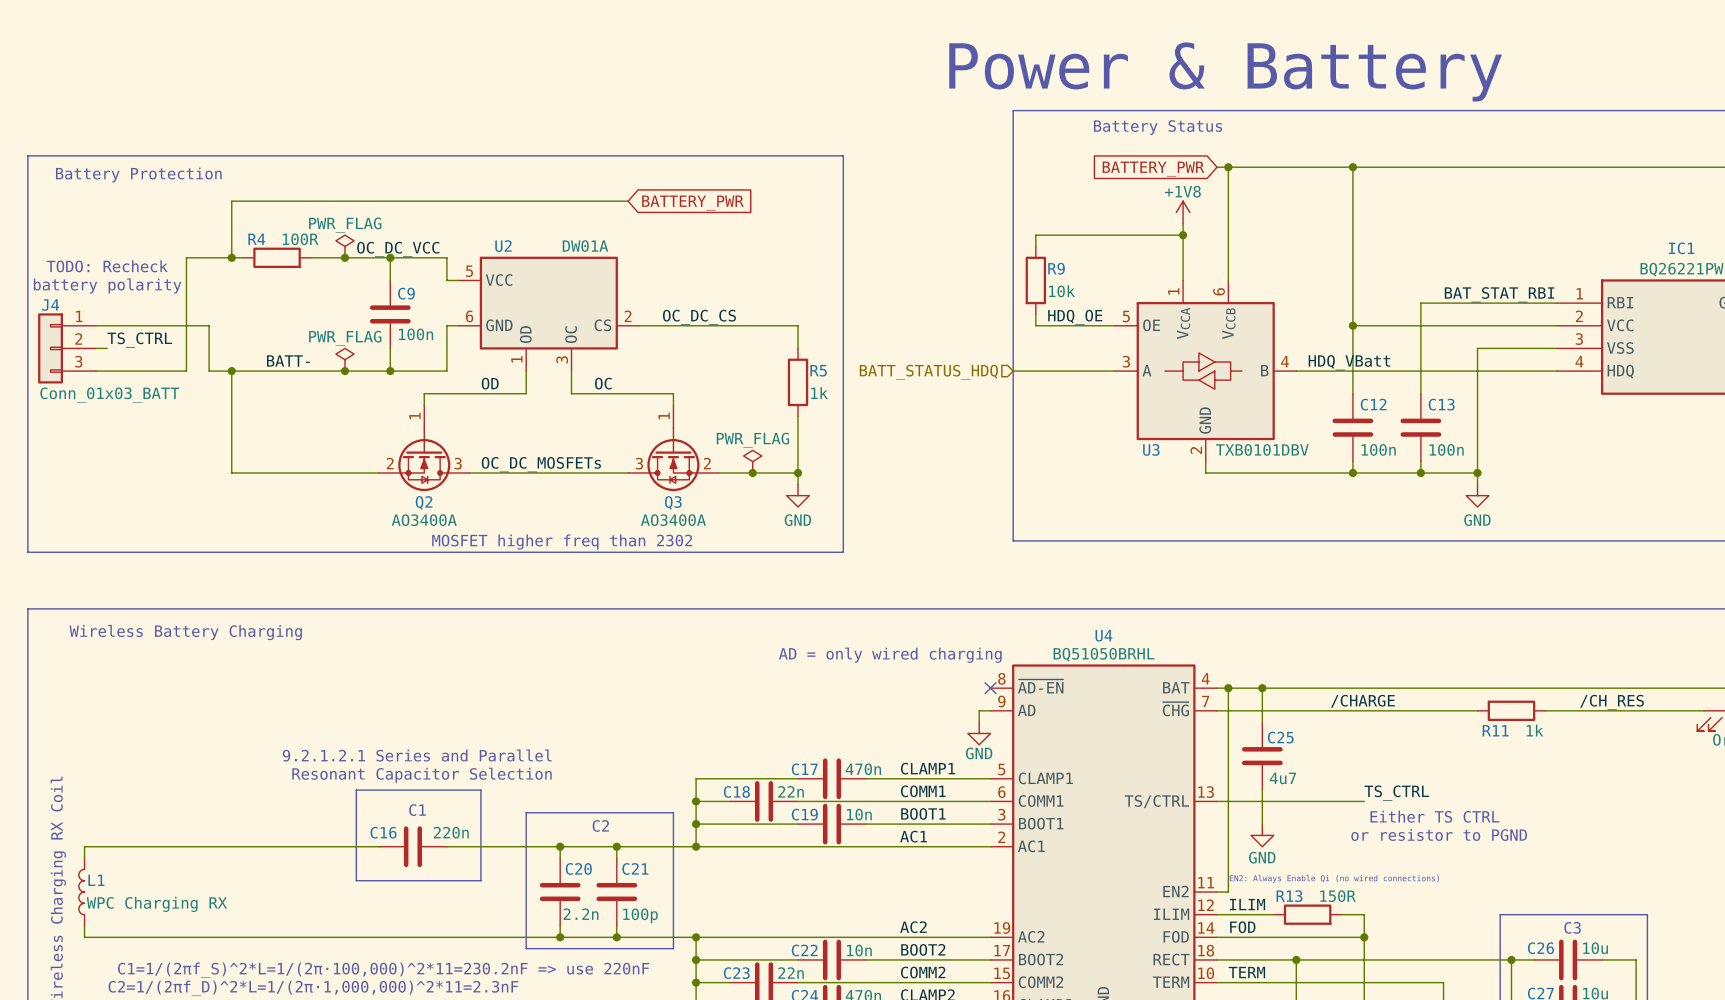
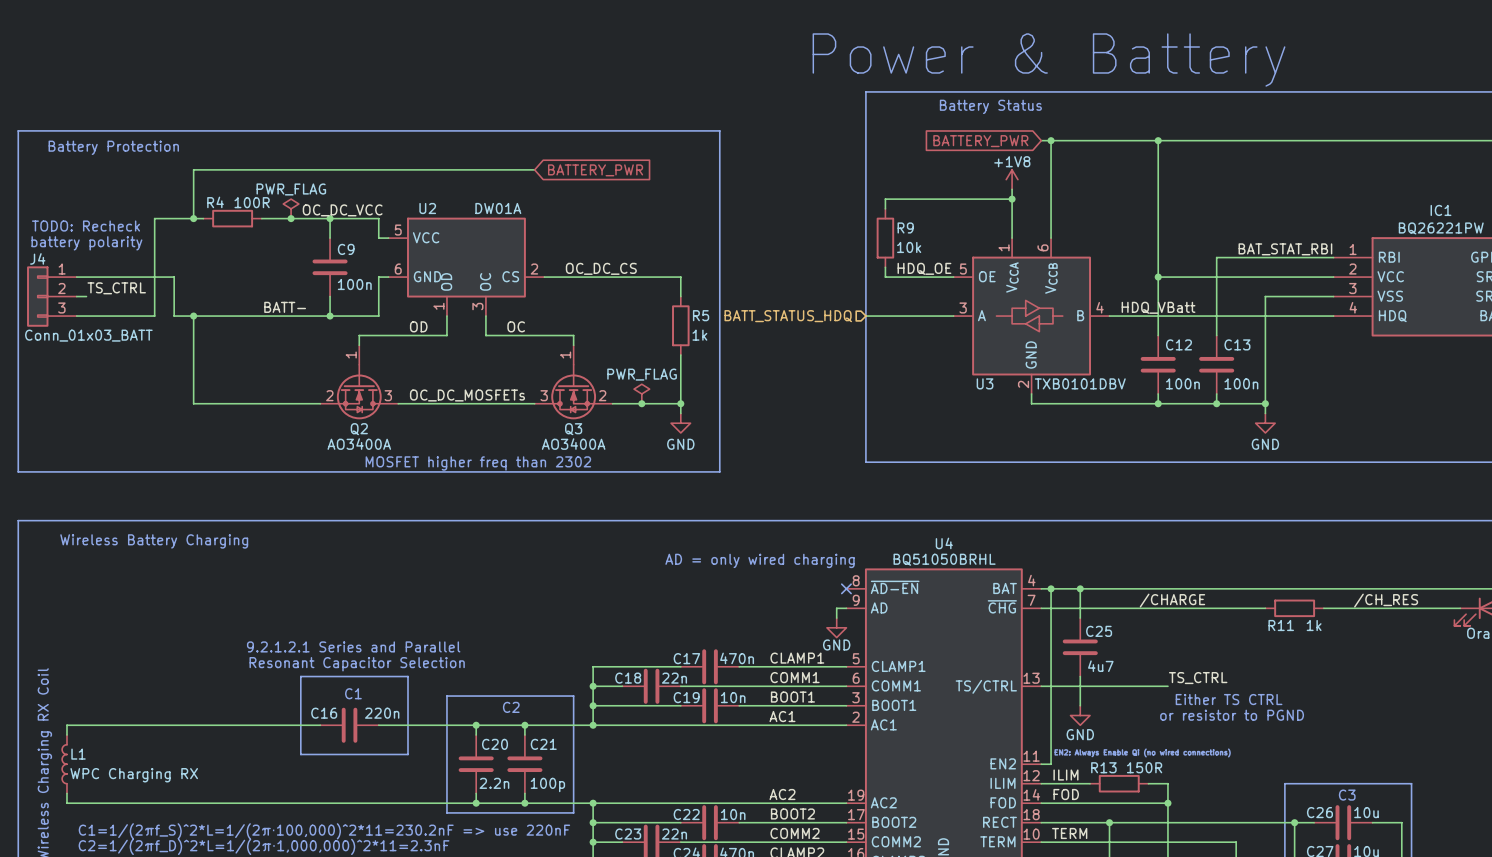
power symbol: PWR_FLAG (345, 359) -> none
label position: BATT- (288, 360) -> BATT- (285, 307)
junction: (345, 371) -> none

